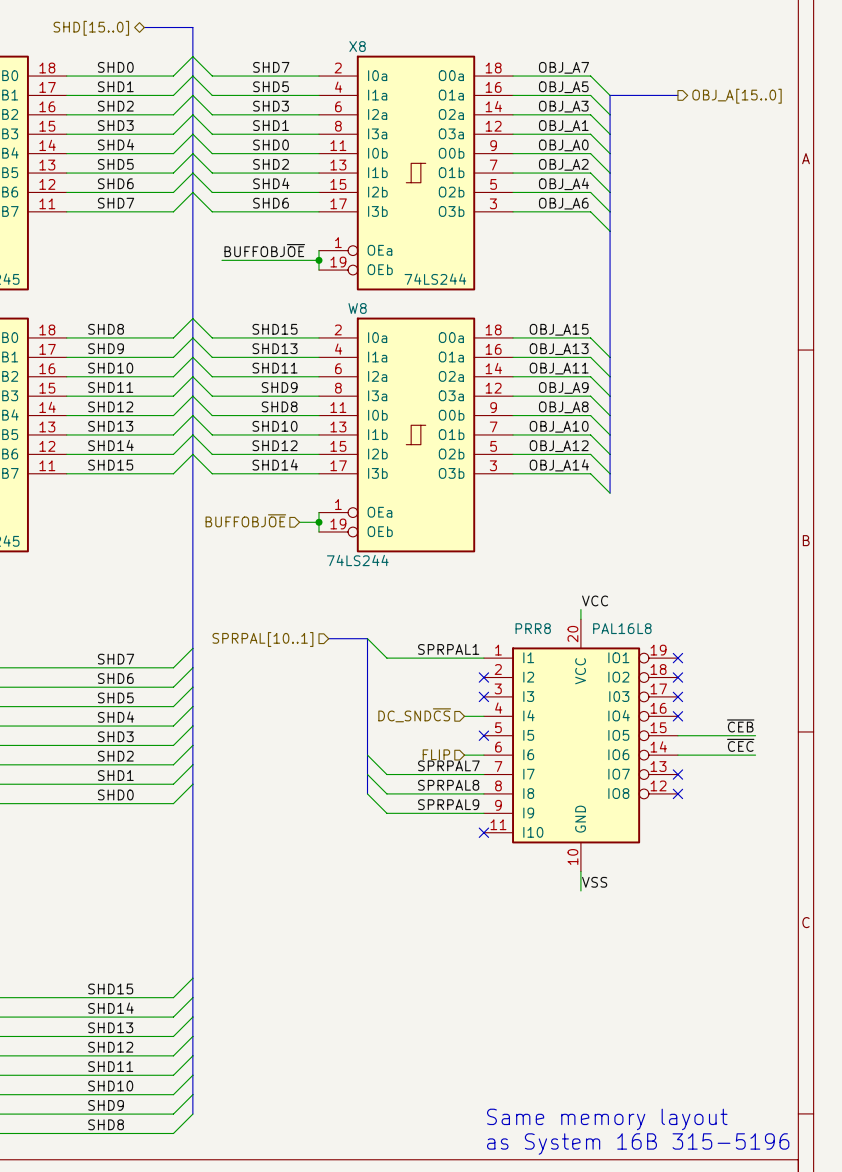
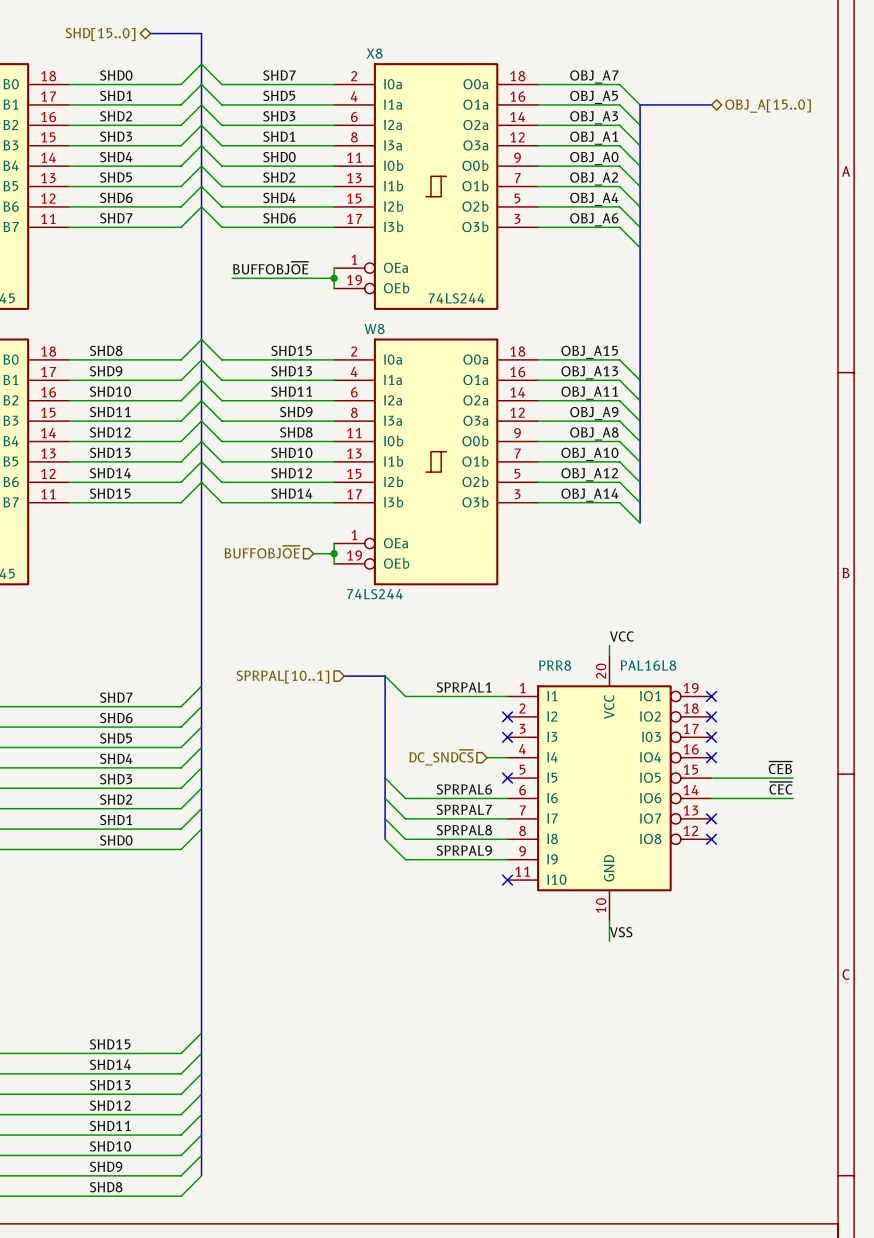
hierarchical label shape: output (737, 96) -> bidirectional (768, 106)
wire: none -> (385, 778) (405, 798) (487, 798)
label: none -> SPRPAL6 (464, 789)
hierarchical label: FLIP (436, 754) -> none
text: Same memory layout (607, 1119) -> none
text: as System 16B 315-5196 (638, 1144) -> none

